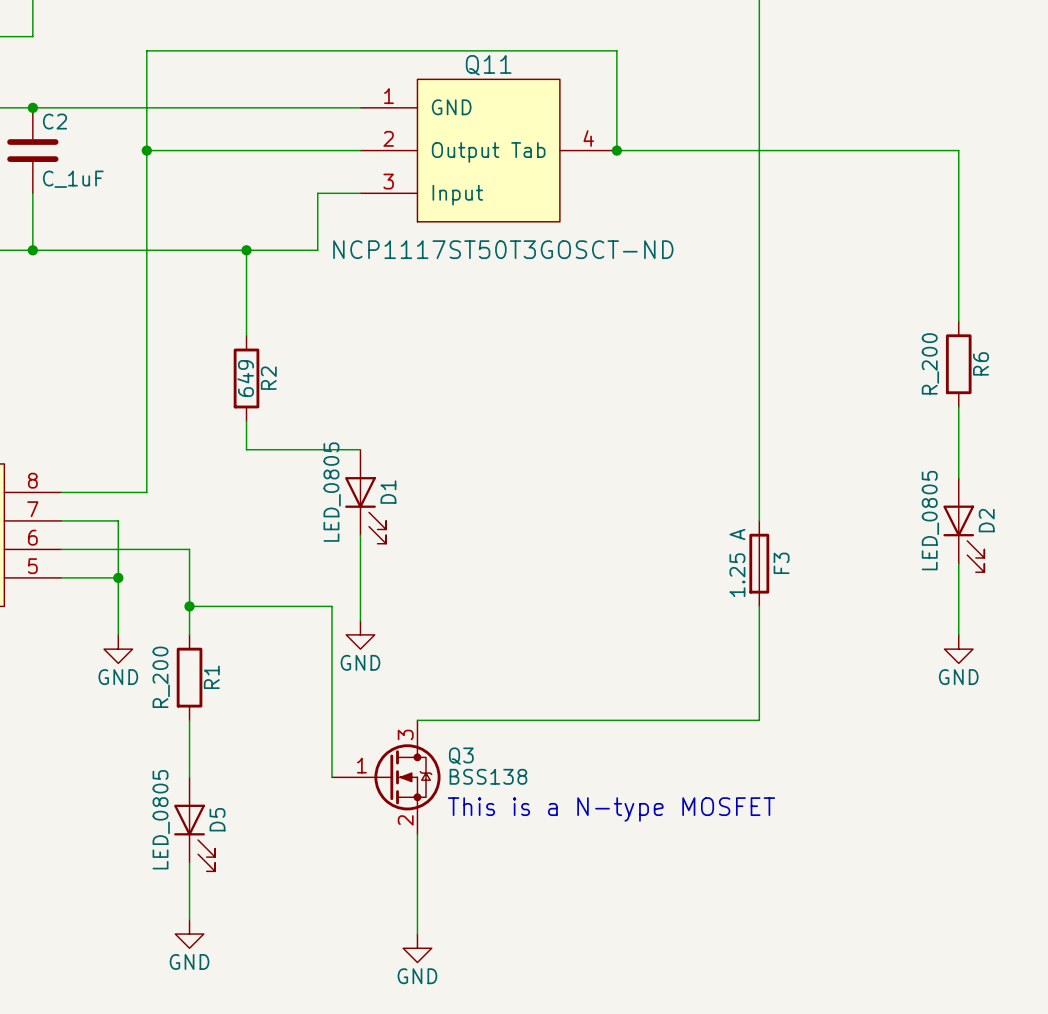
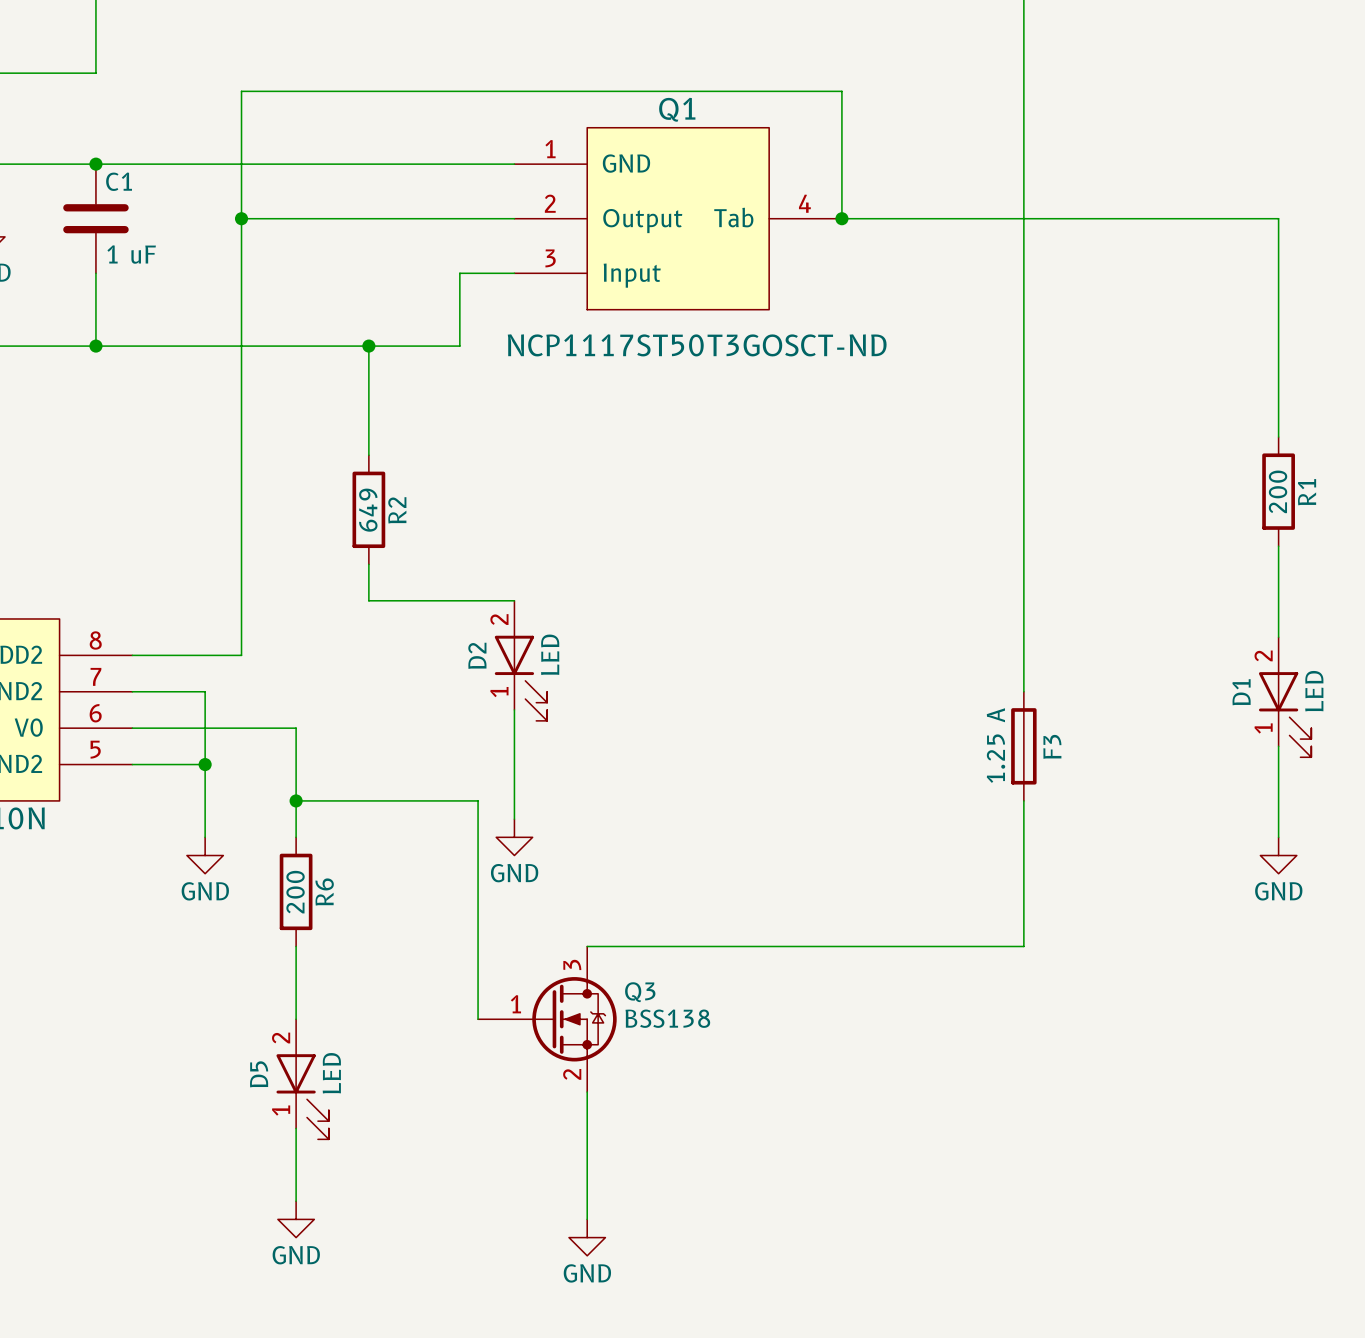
Q11 name: Q11 (488, 65) -> Q1 (677, 109)
C2 name: C2 (55, 121) -> C1 (119, 181)
C2 value: C_1uF (73, 179) -> 1 uF (131, 254)
R6 value: R_200 (930, 363) -> 200 (1278, 491)
R6 name: R6 (981, 363) -> R1 (1307, 492)
D2 pin number: none -> 2 (499, 619)
D1 value: LED_0805 (332, 492) -> LED (1314, 691)
D1 name position: D1 (388, 492) -> D1 (1241, 692)
D1 pin number: none -> 2 (1263, 655)
D1 position: (365, 496) -> (1285, 697)
D2 pin number: none -> 1 (499, 692)
D2 value: LED_0805 (930, 520) -> LED (550, 654)
D2 name position: D2 (986, 520) -> D2 (477, 655)
D2 position: (963, 525) -> (520, 660)
D1 pin number: none -> 1 (1263, 728)
R1 value: R_200 (161, 677) -> 200 (295, 892)
R1 name: R1 (211, 677) -> R6 (324, 892)
D5 pin number: none -> 2 (281, 1038)
text: This is a N-type MOSFET (611, 809) -> none
D5 value: LED_0805 (161, 819) -> LED (331, 1073)
D5 name position: D5 (217, 819) -> D5 (259, 1074)
D5 pin number: none -> 1 (281, 1110)

